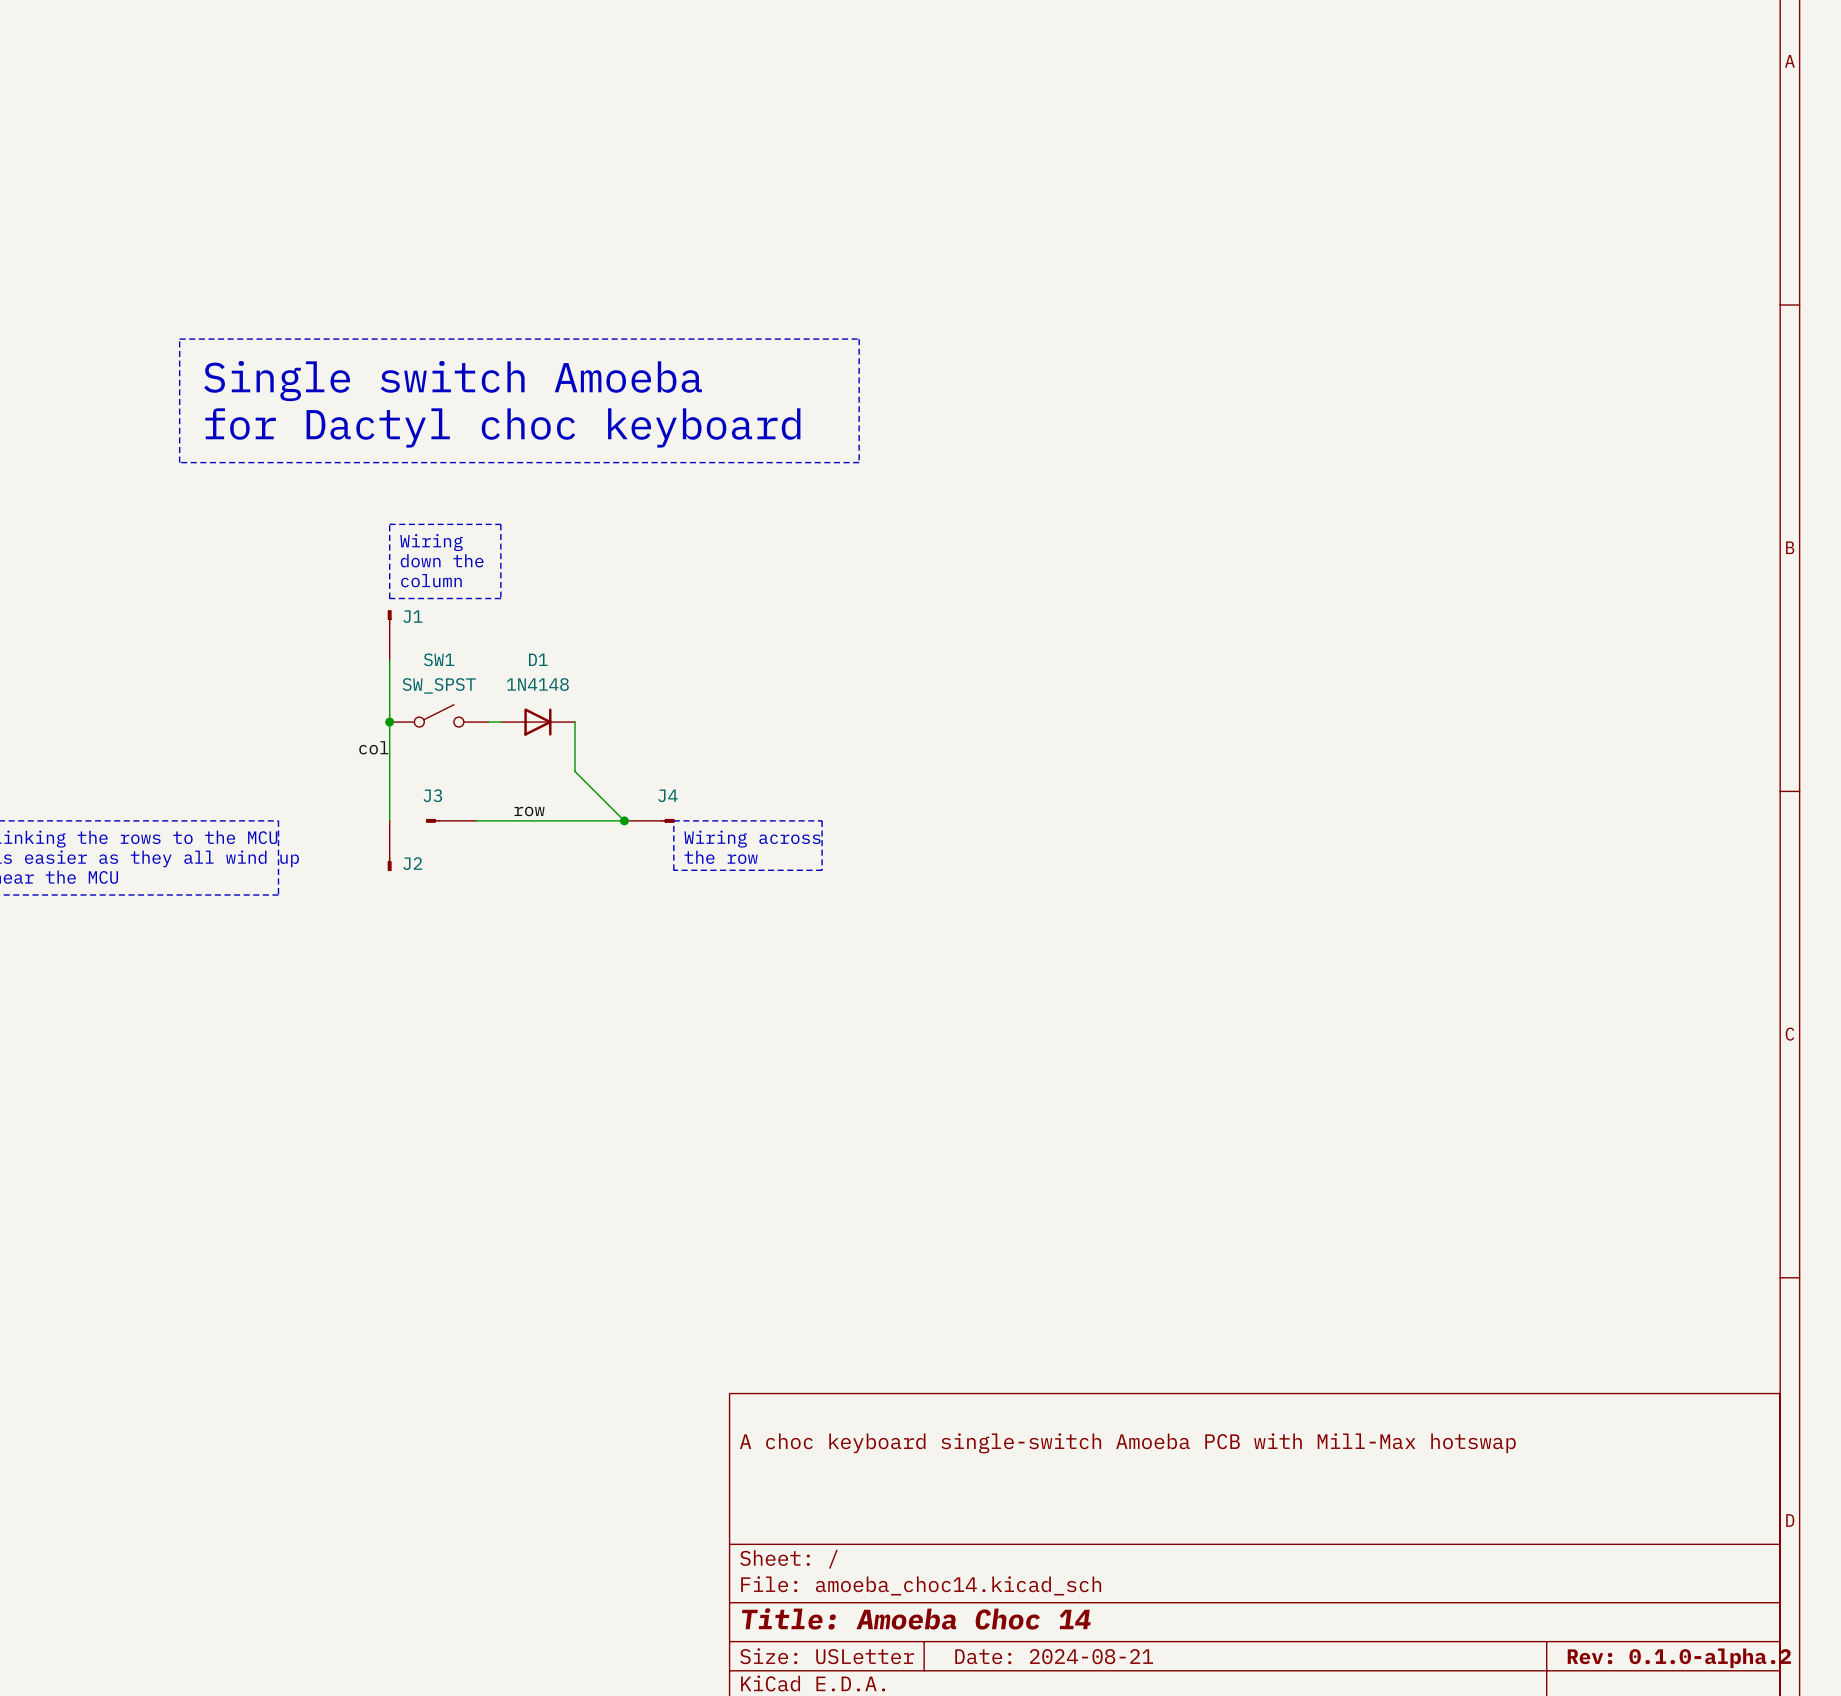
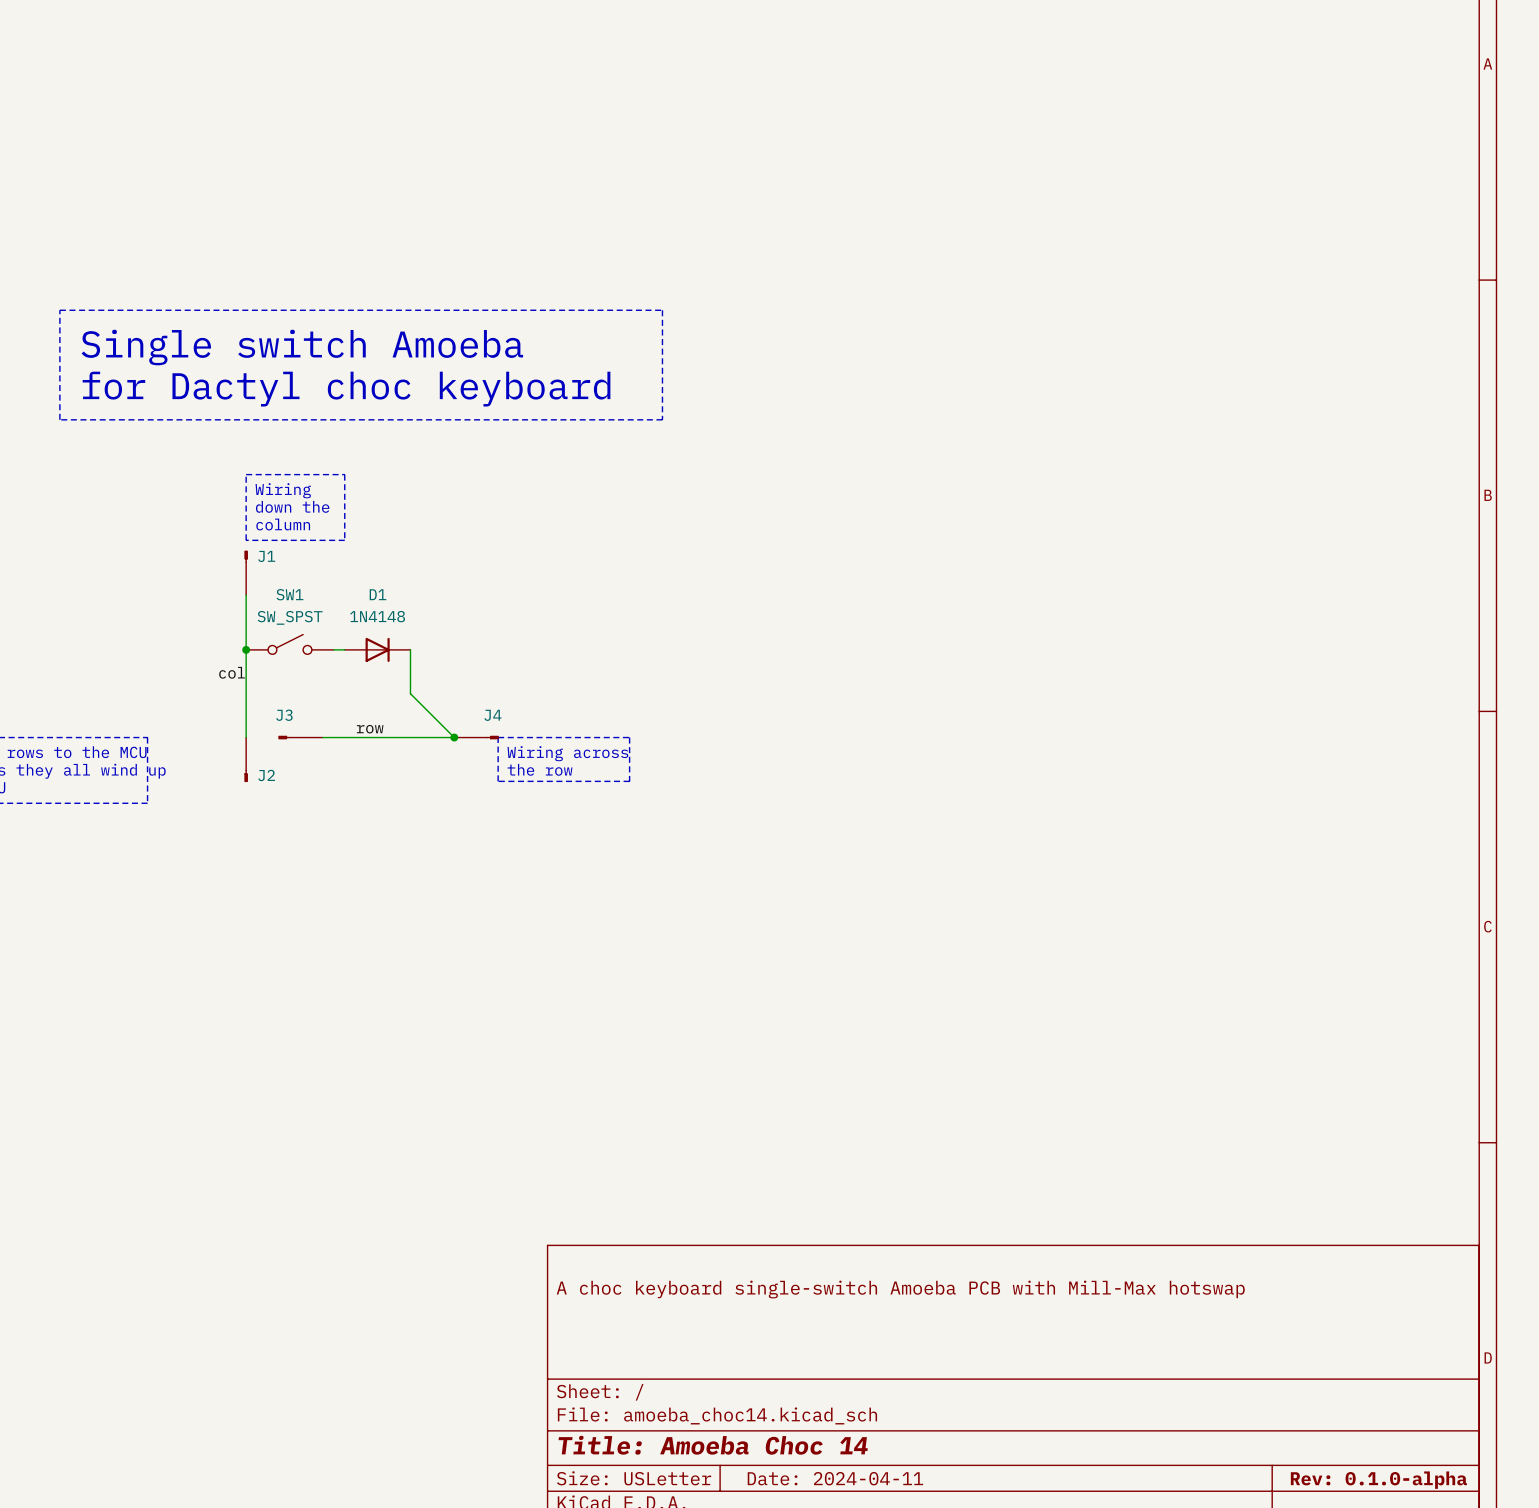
title block: Date: 2024-08-21 (1054, 1656) -> Date: 2024-04-11 (835, 1478)
title block: Rev: 0.1.0-alpha.2 (1679, 1658) -> Rev: 0.1.0-alpha (1378, 1480)

